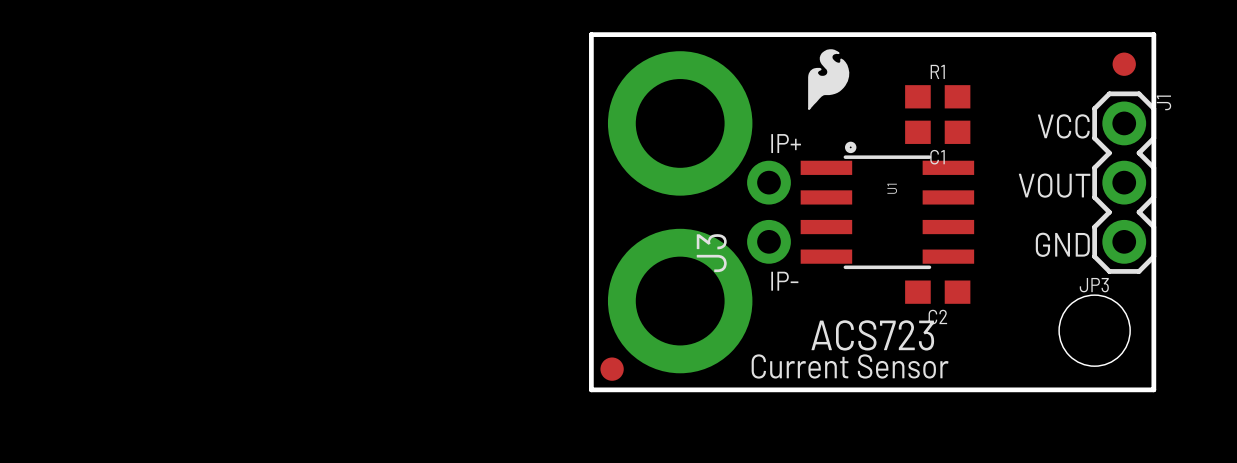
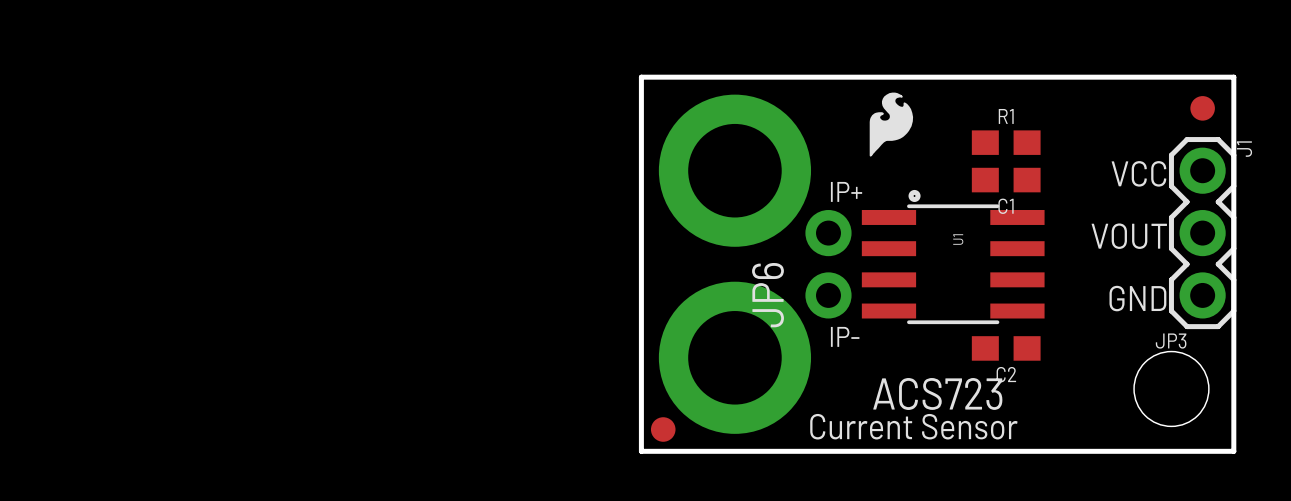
J3 name: J3 (711, 253) -> JP6 (768, 295)

